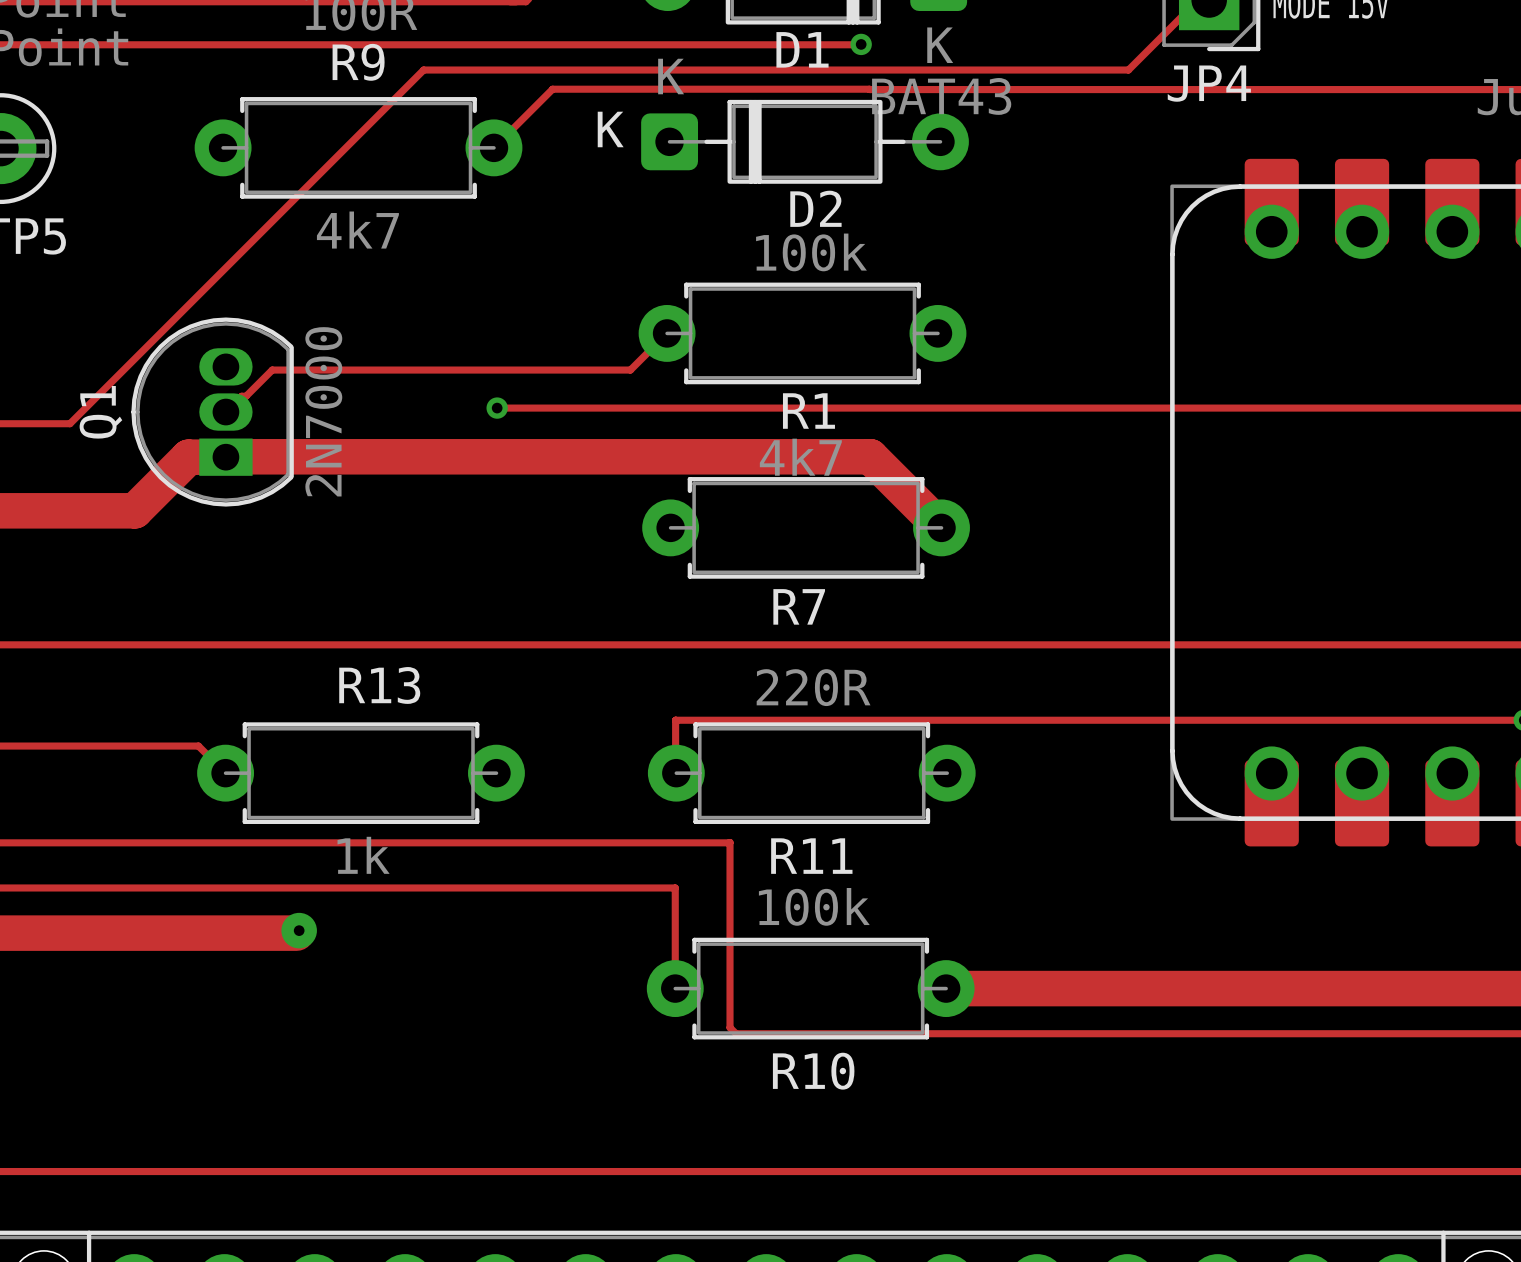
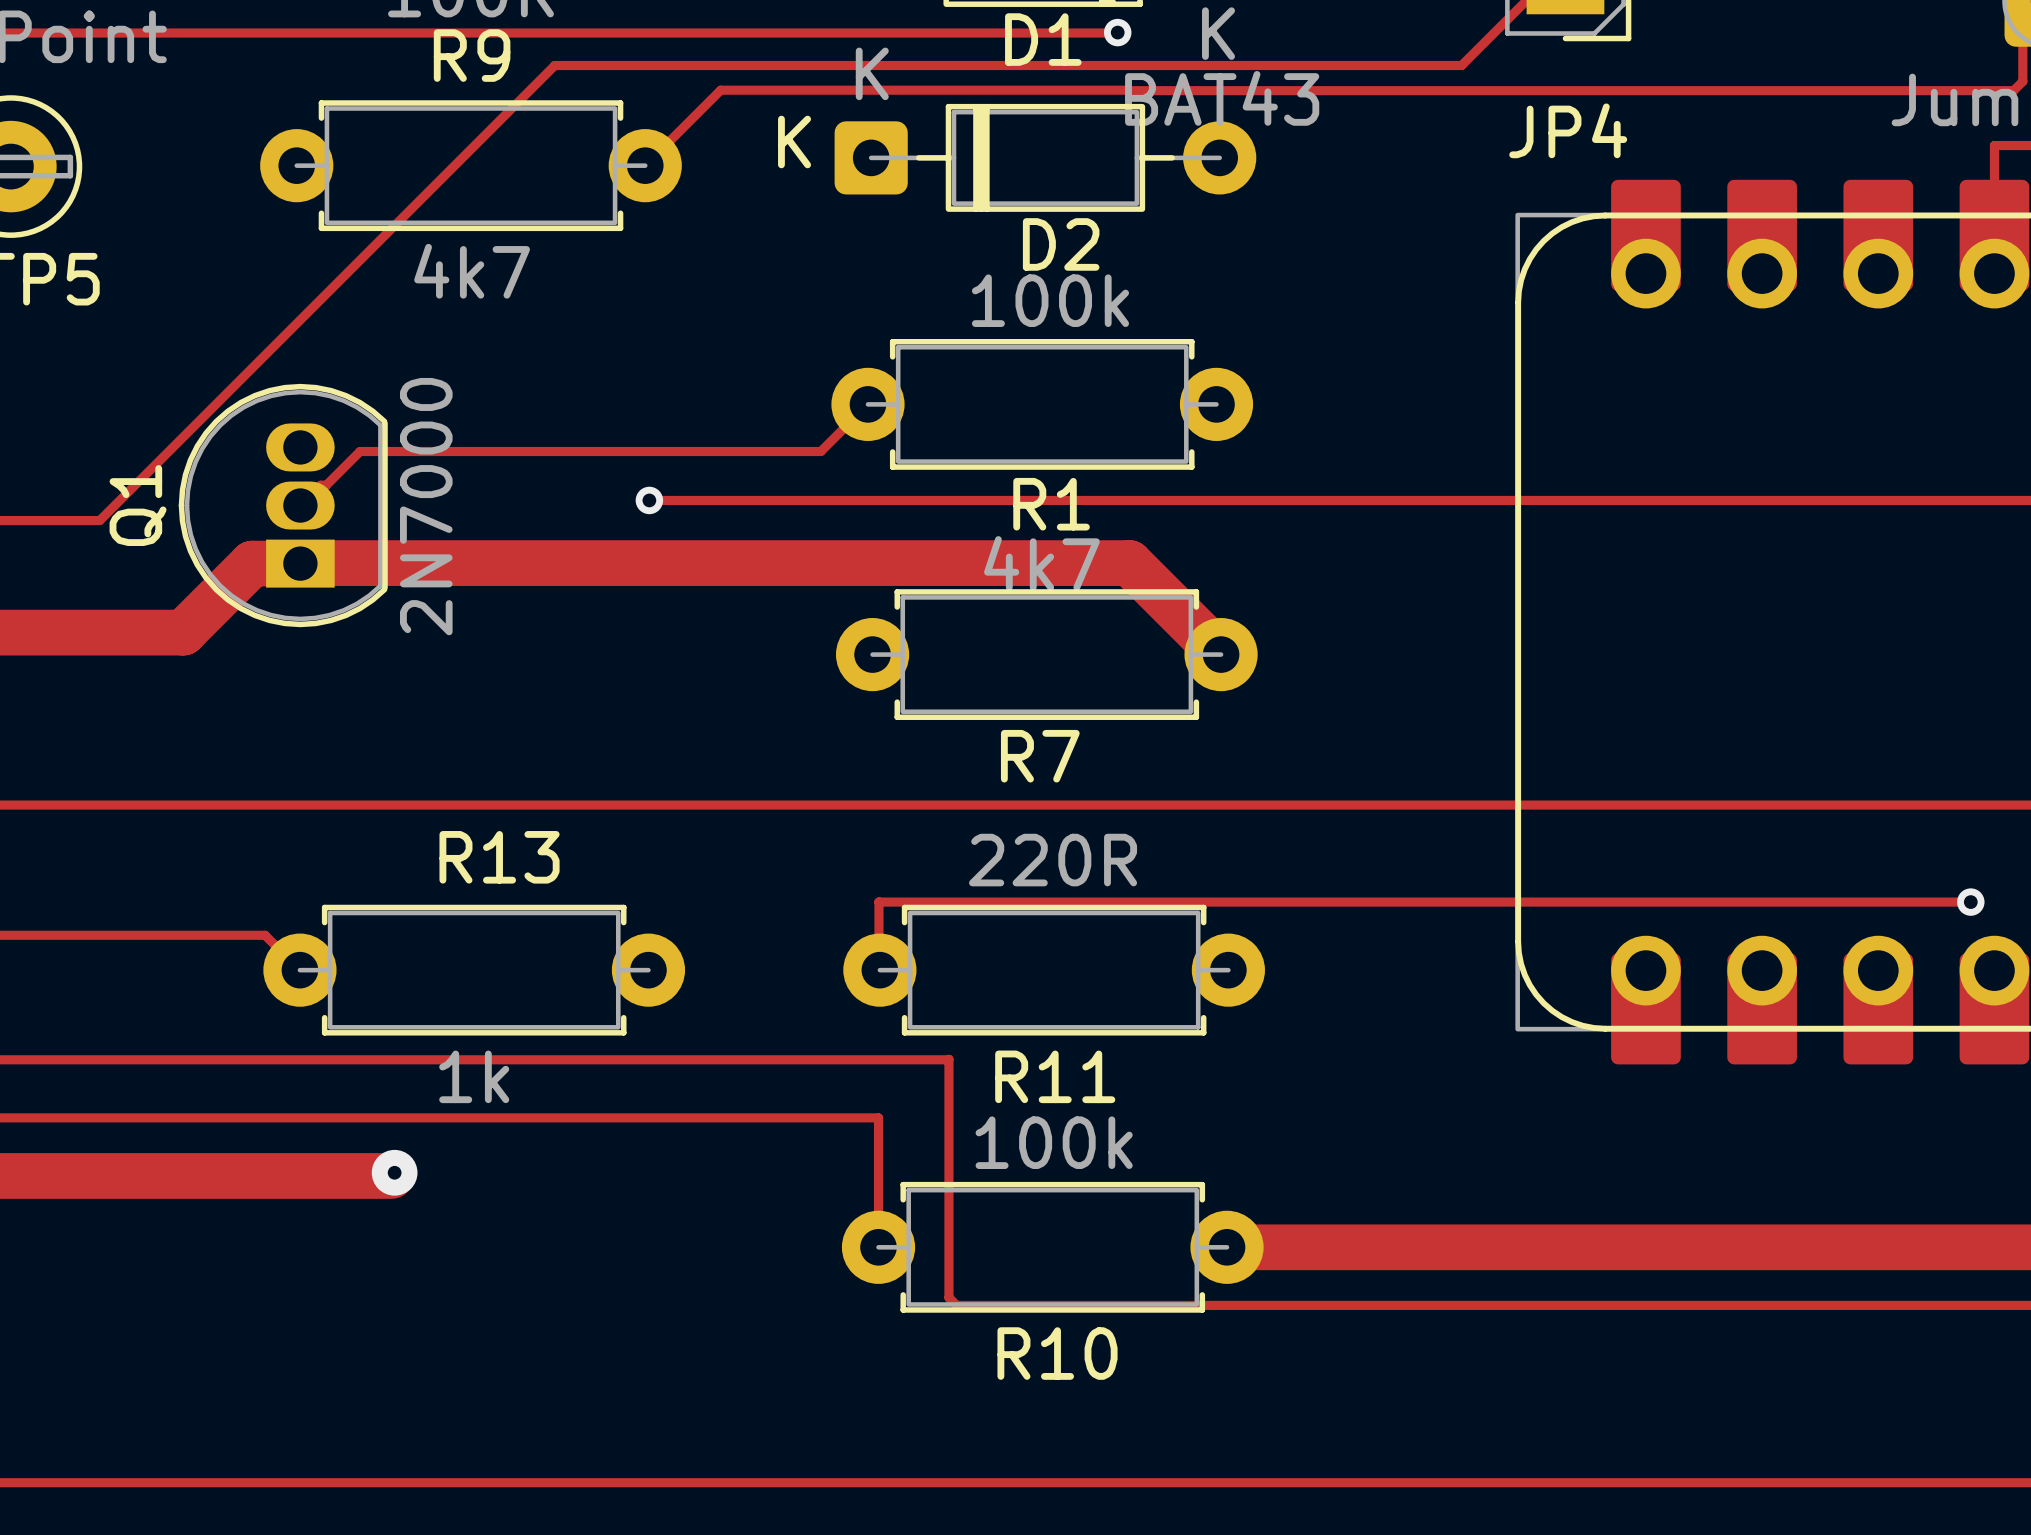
JP4 name position: JP4 (1209, 83) -> JP4 (1568, 130)

